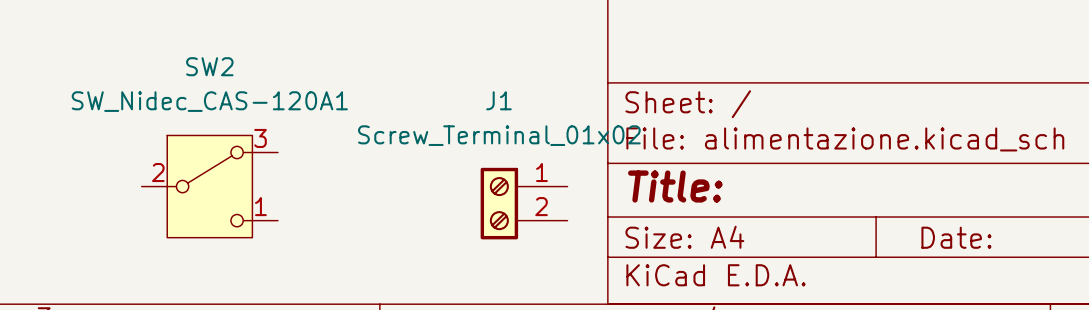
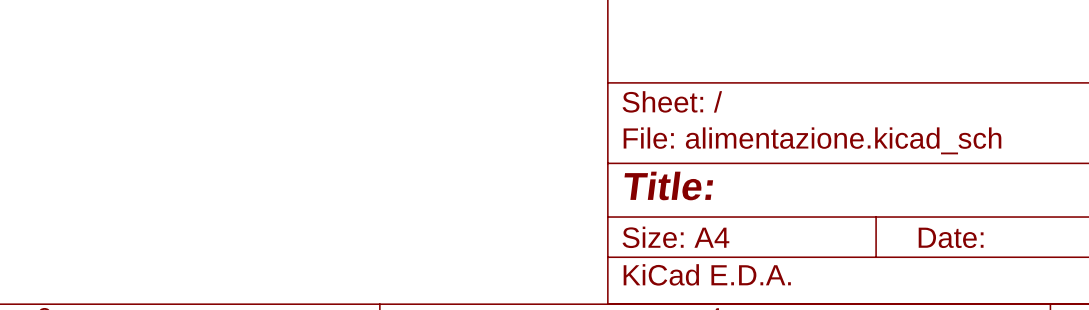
SW2: SW_Nidec_CAS-120A1 (209, 186) -> none
J1: Screw_Terminal_01x02 (524, 203) -> none

